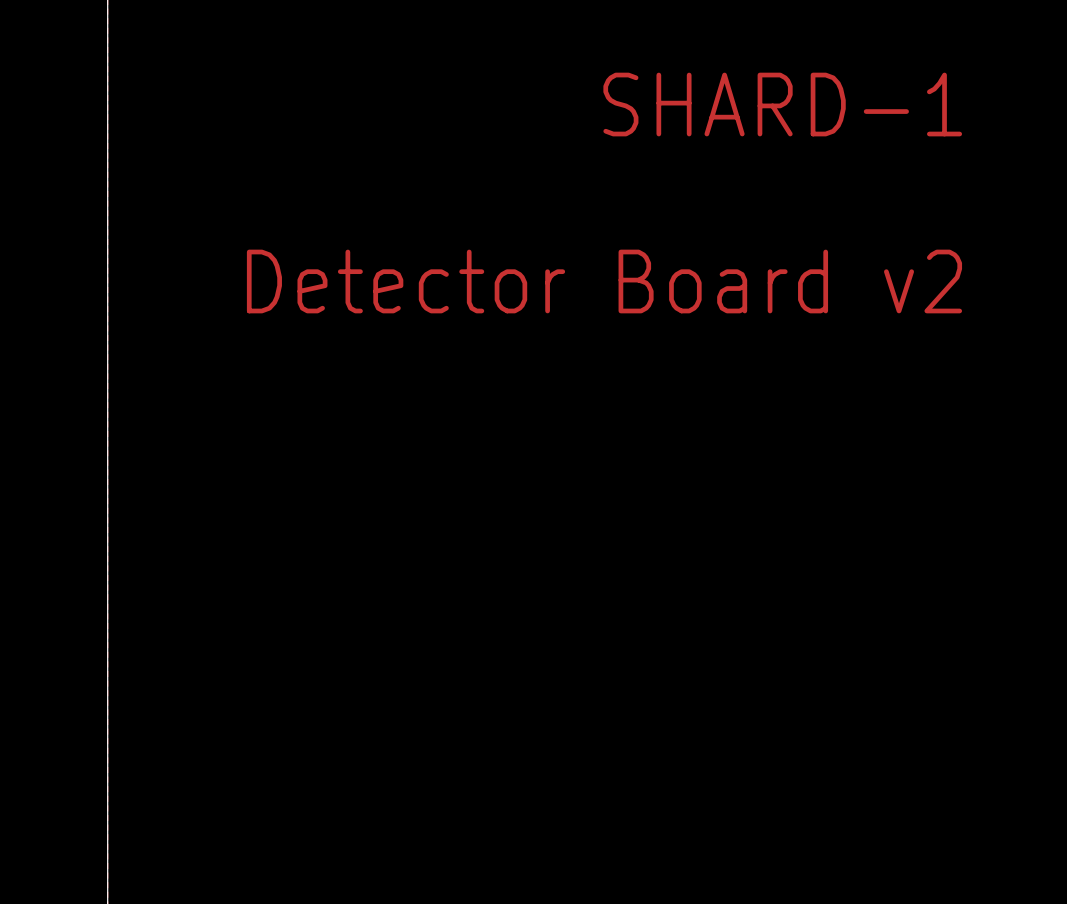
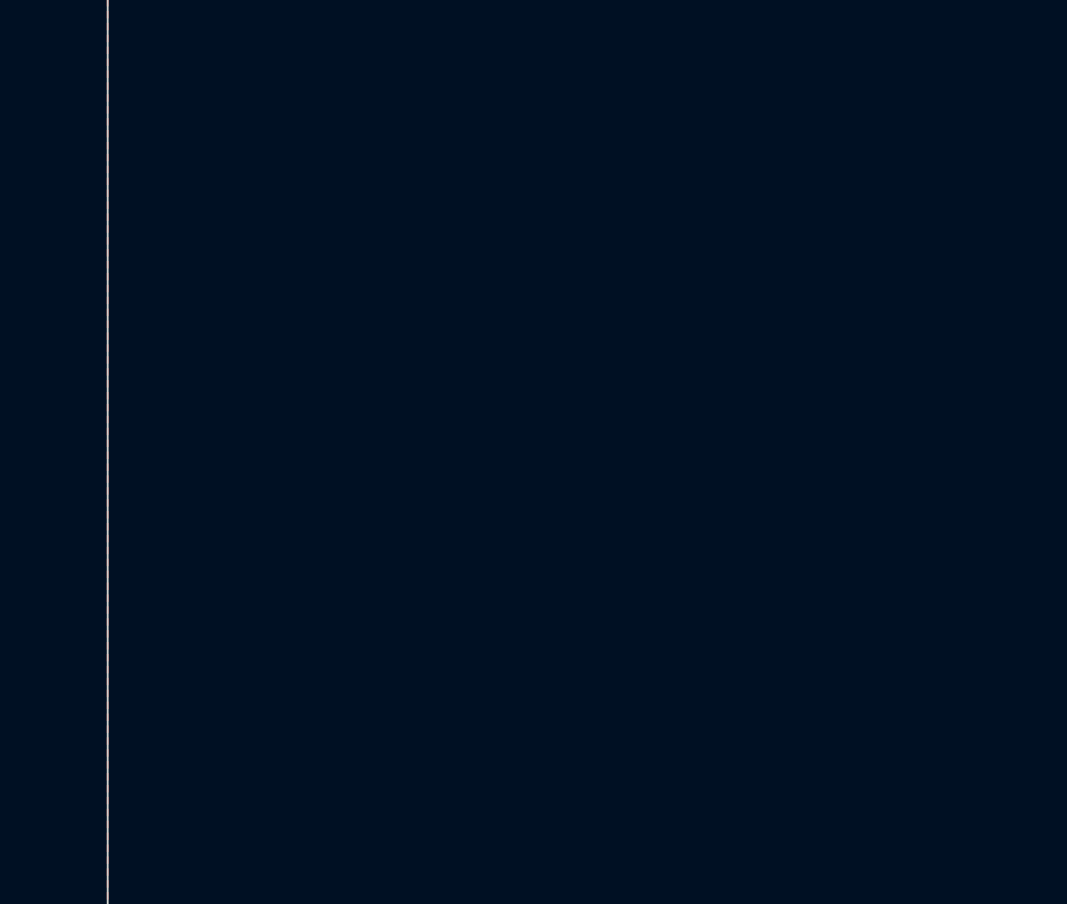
text: SHARD-1 (782, 104) -> none
text: Detector Board v2 (604, 281) -> none

